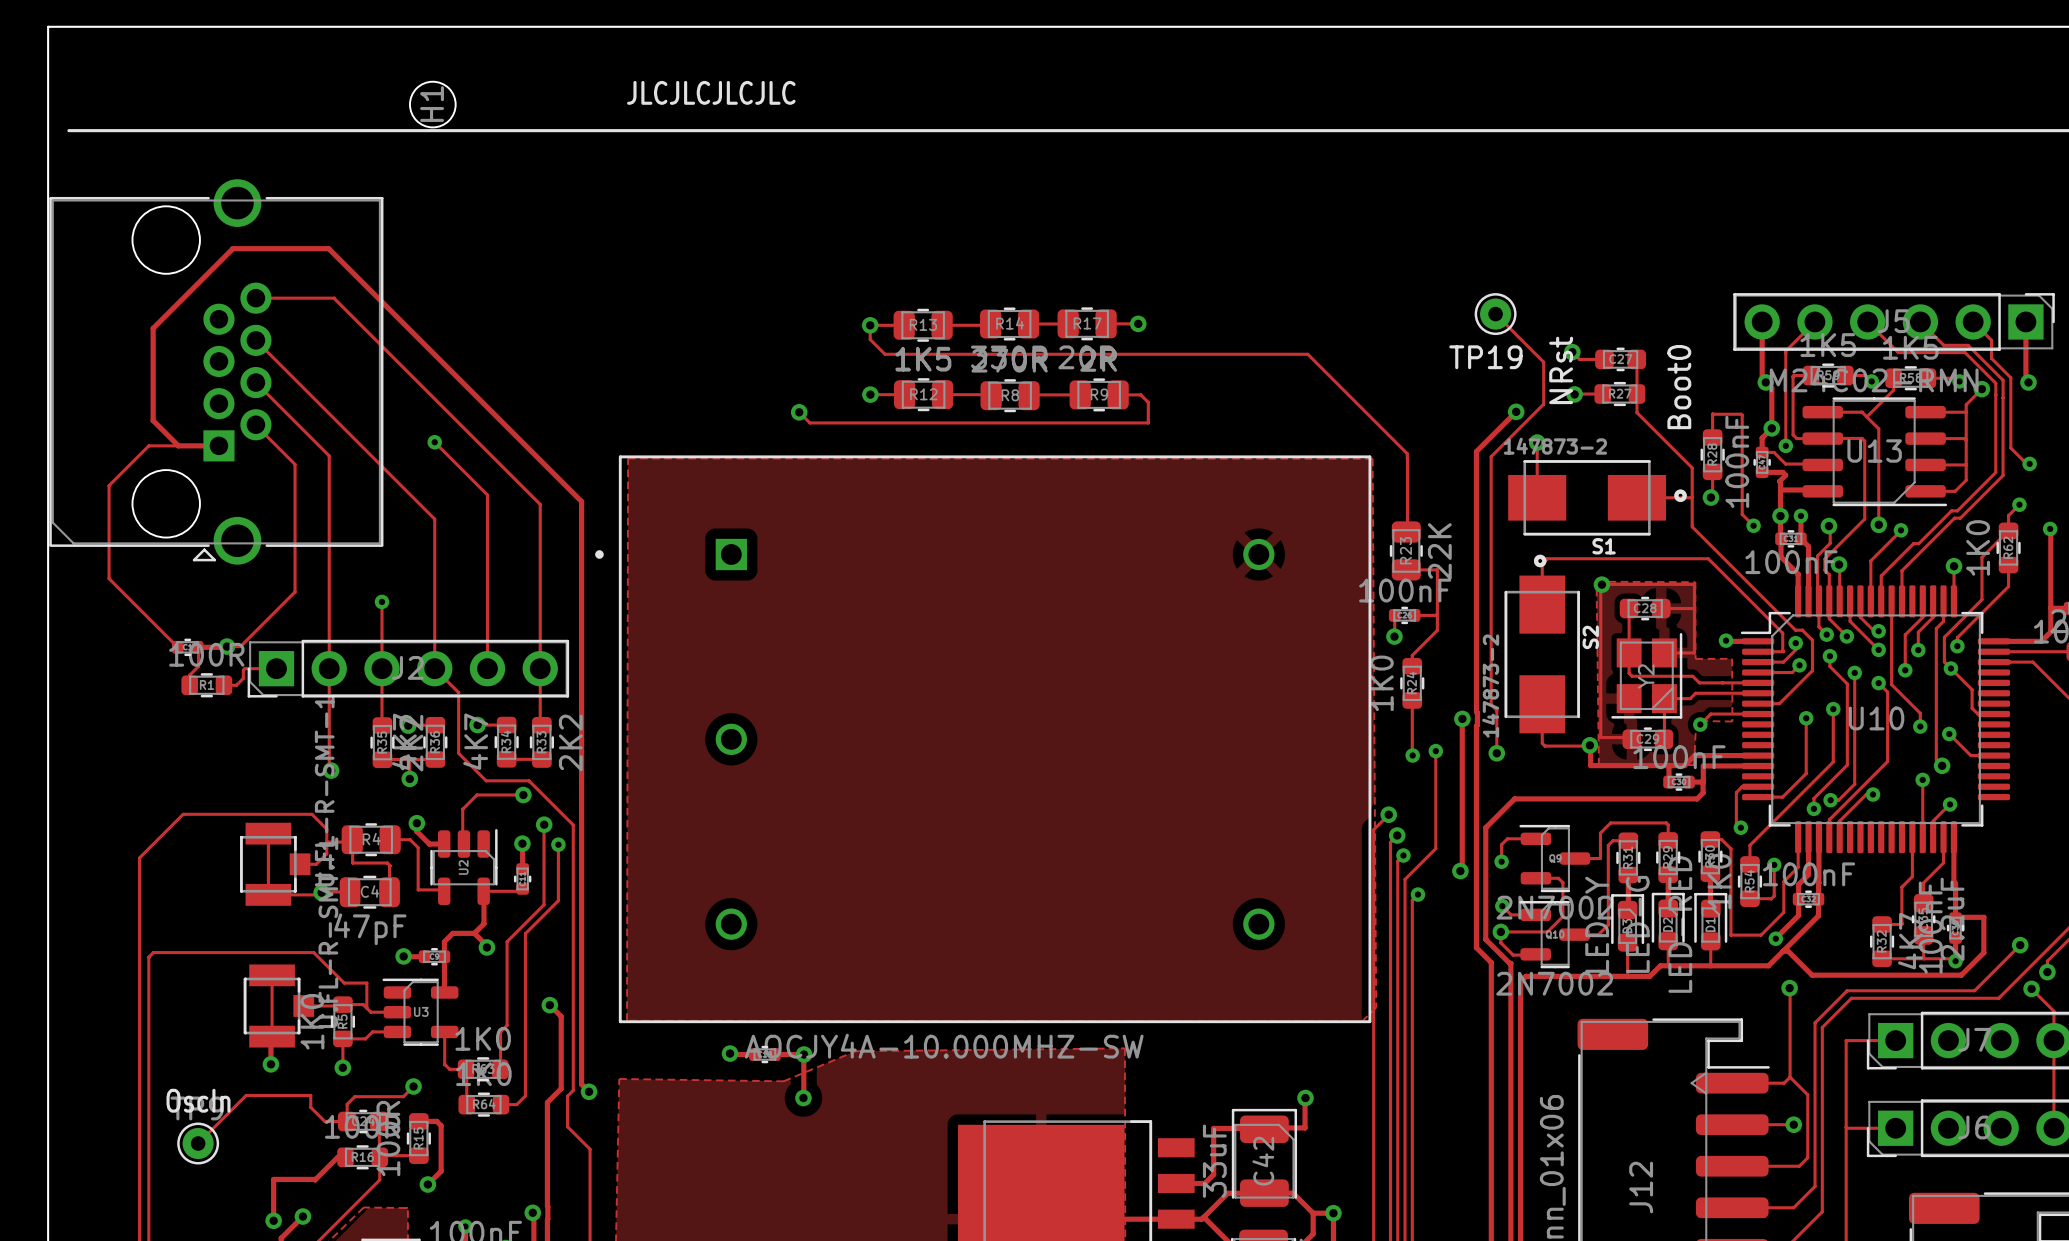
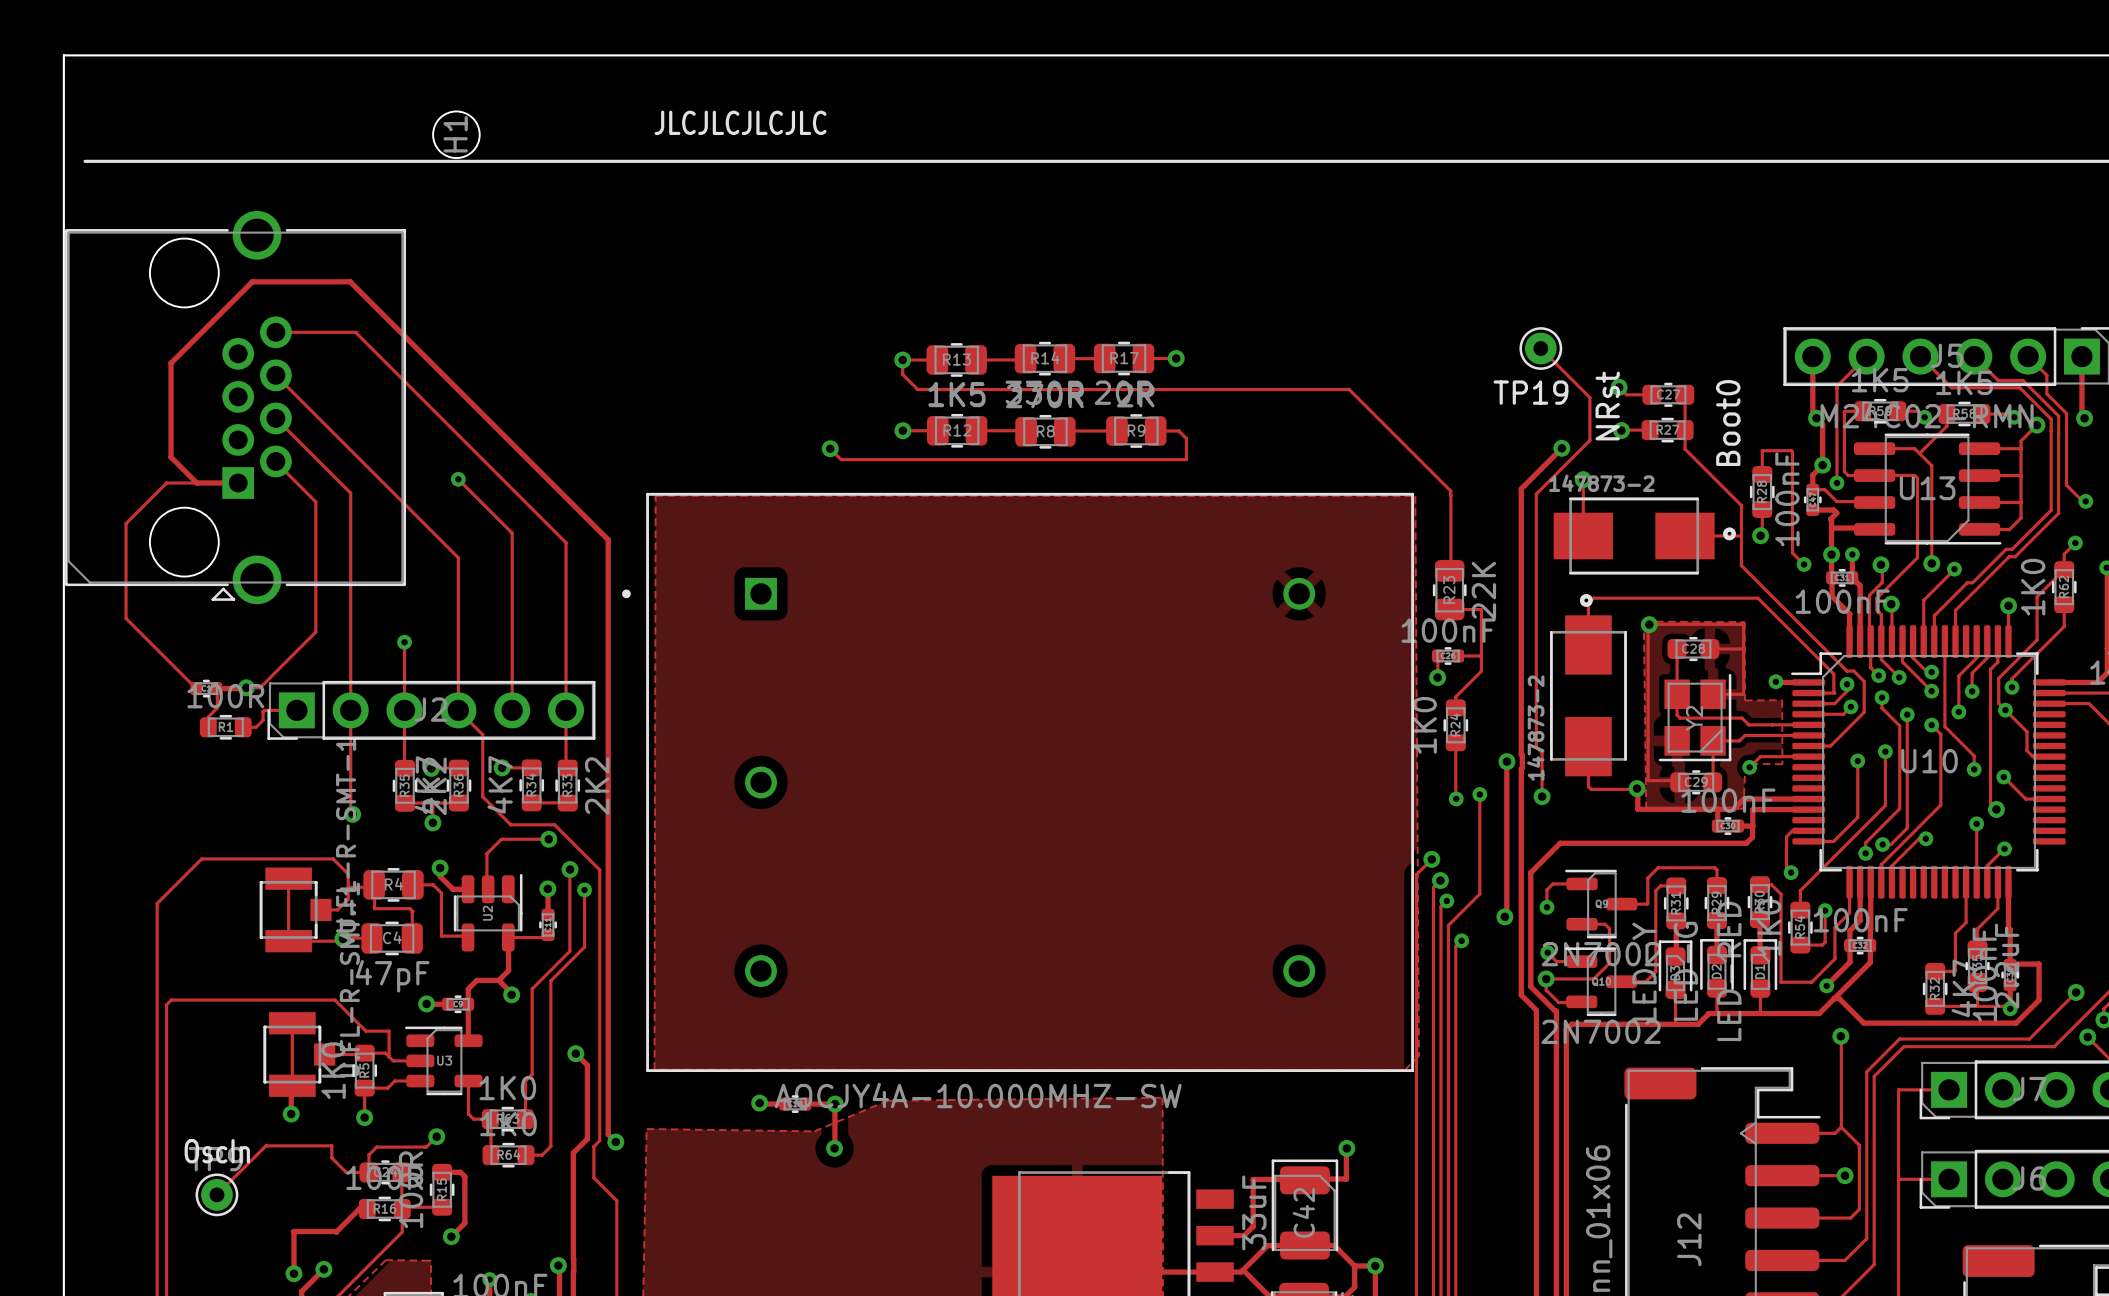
S1 name: S1 (1604, 546) -> none
S2 name: S2 (1590, 637) -> none

